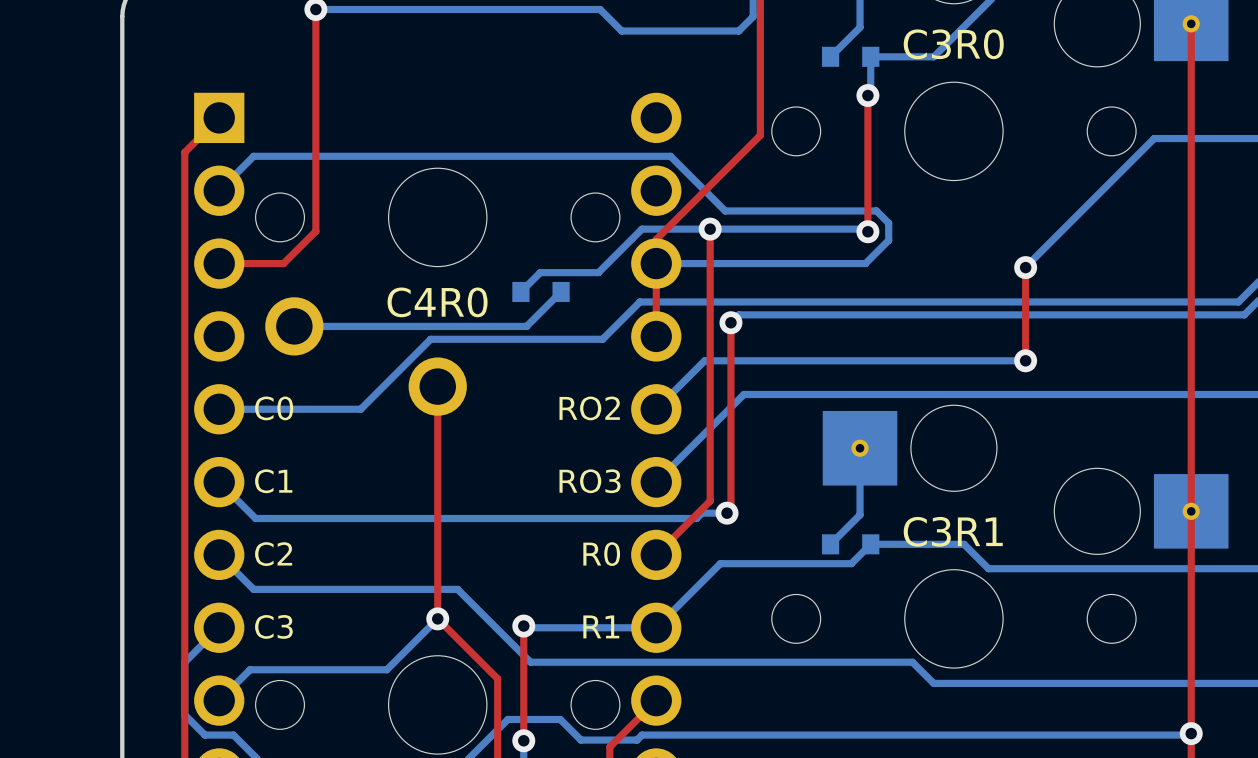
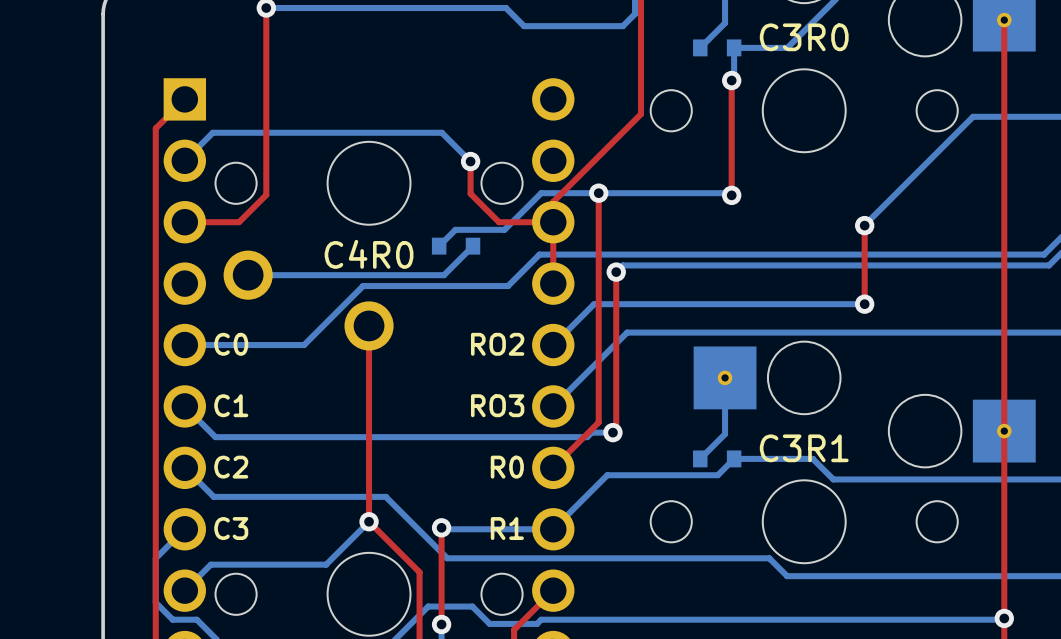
bottom track: (252, 157) (670, 156) (725, 210) (876, 210) (888, 223) (888, 240) (865, 263) (656, 263) -> (212, 132) (441, 132) (470, 161)
top track: none -> (470, 161) (470, 193) (499, 222) (553, 222)
via: none -> (470, 161)

